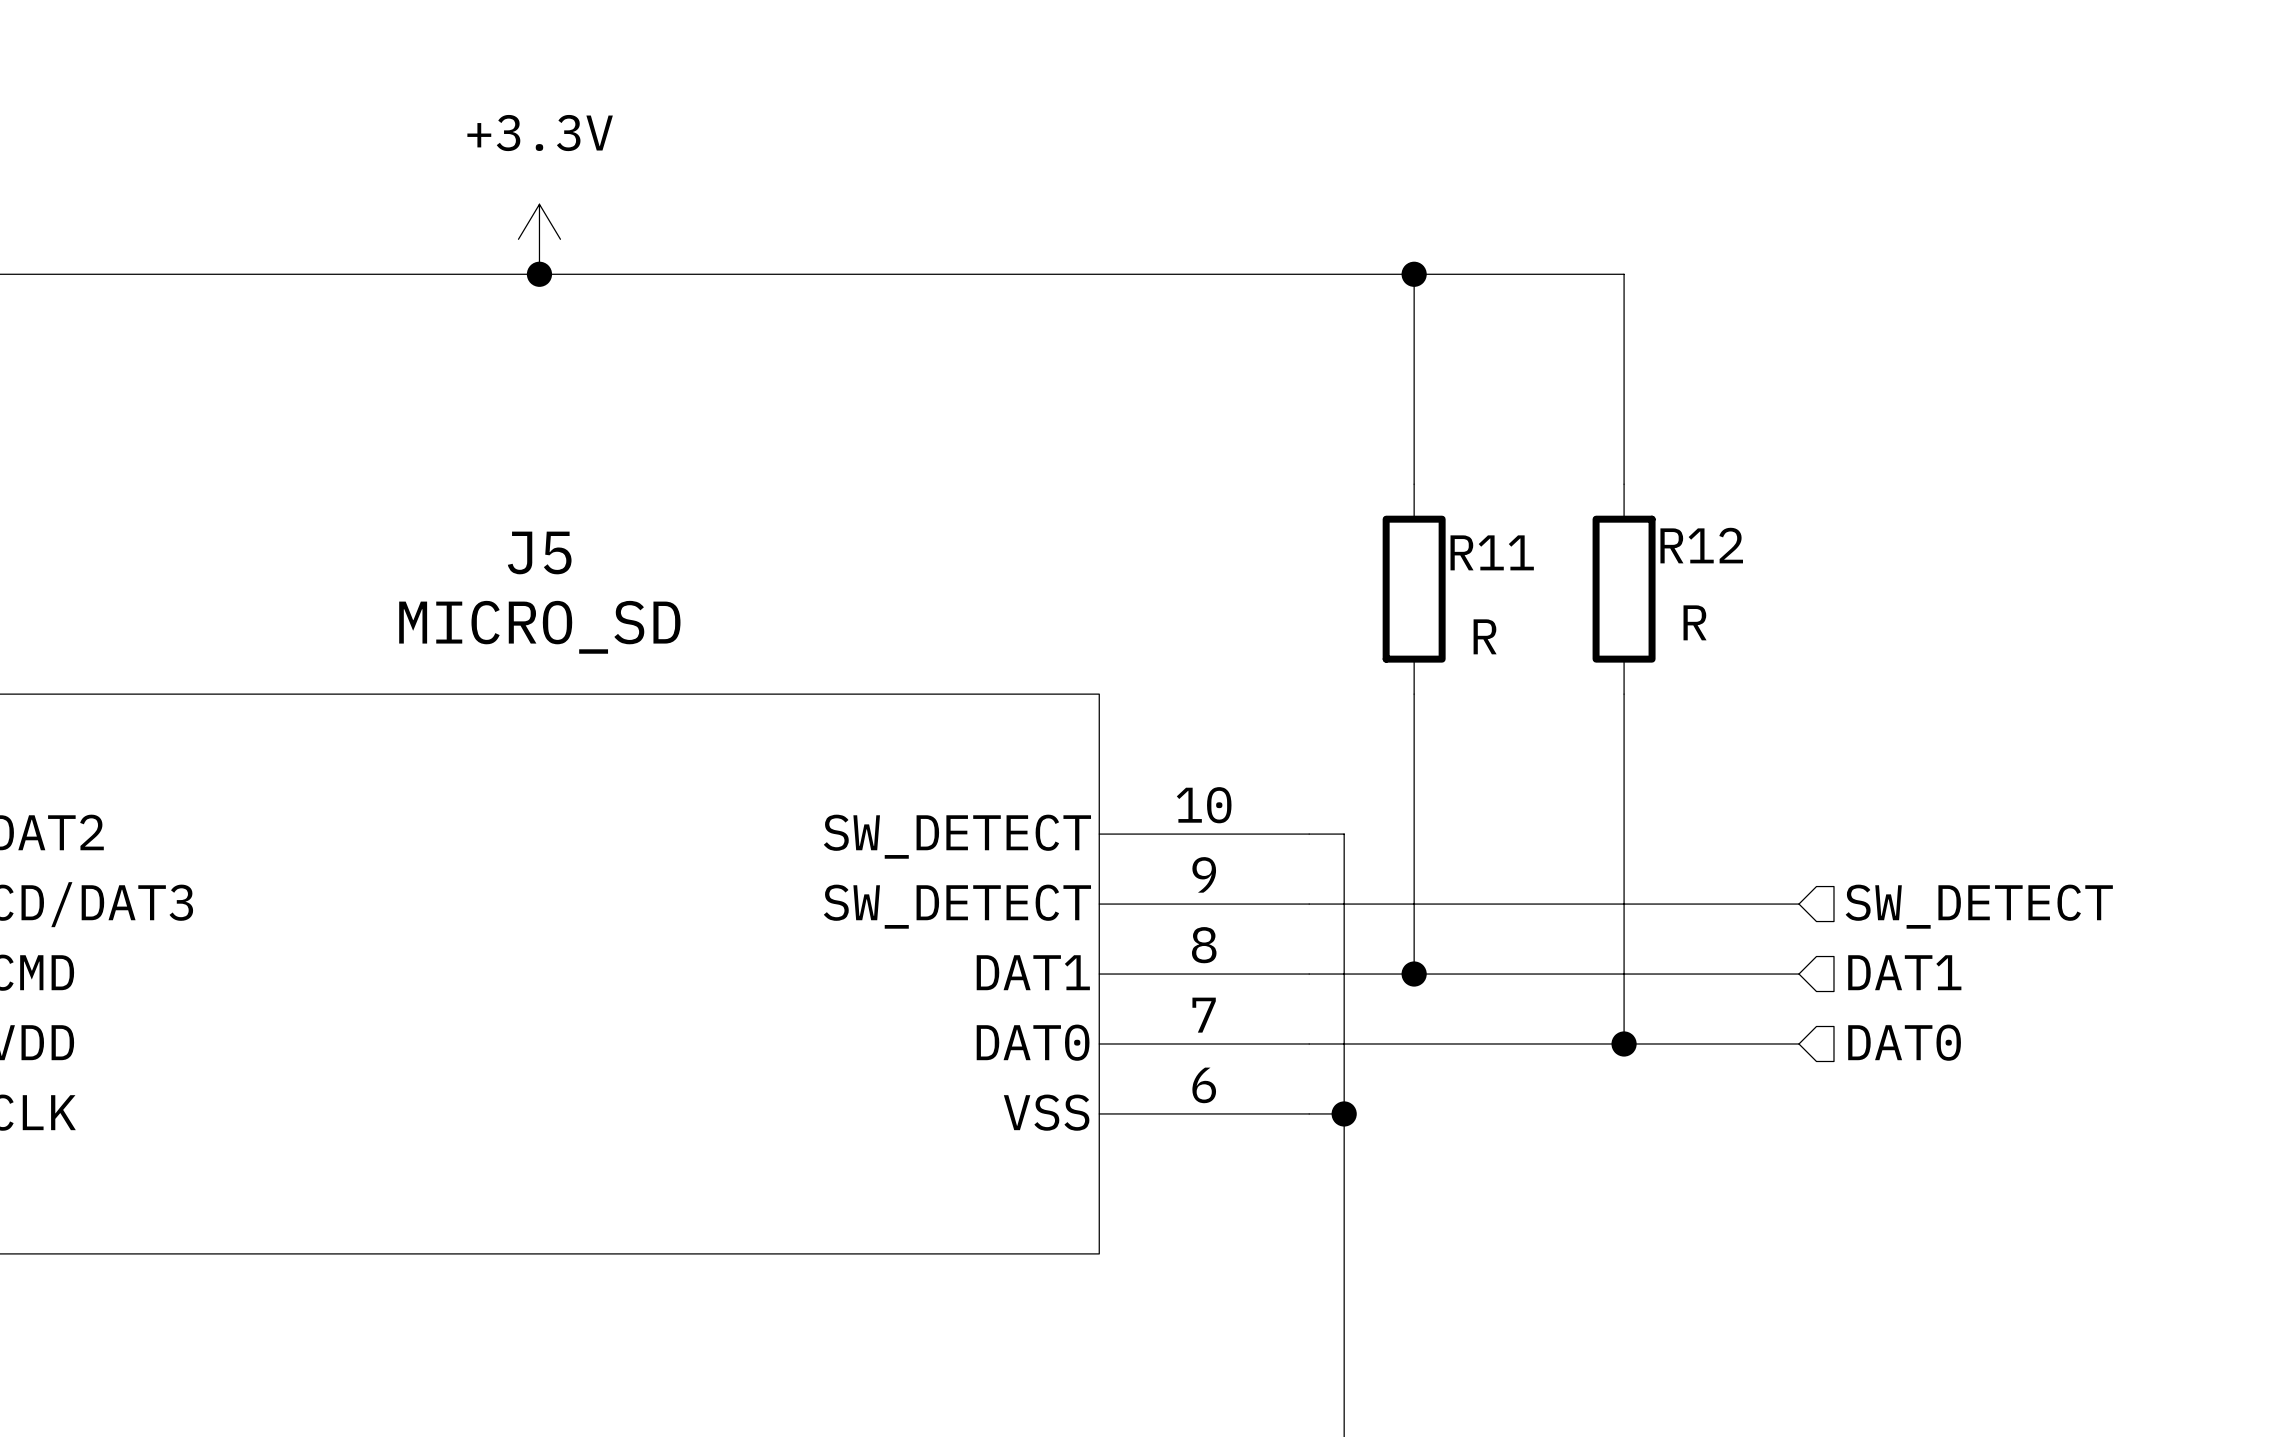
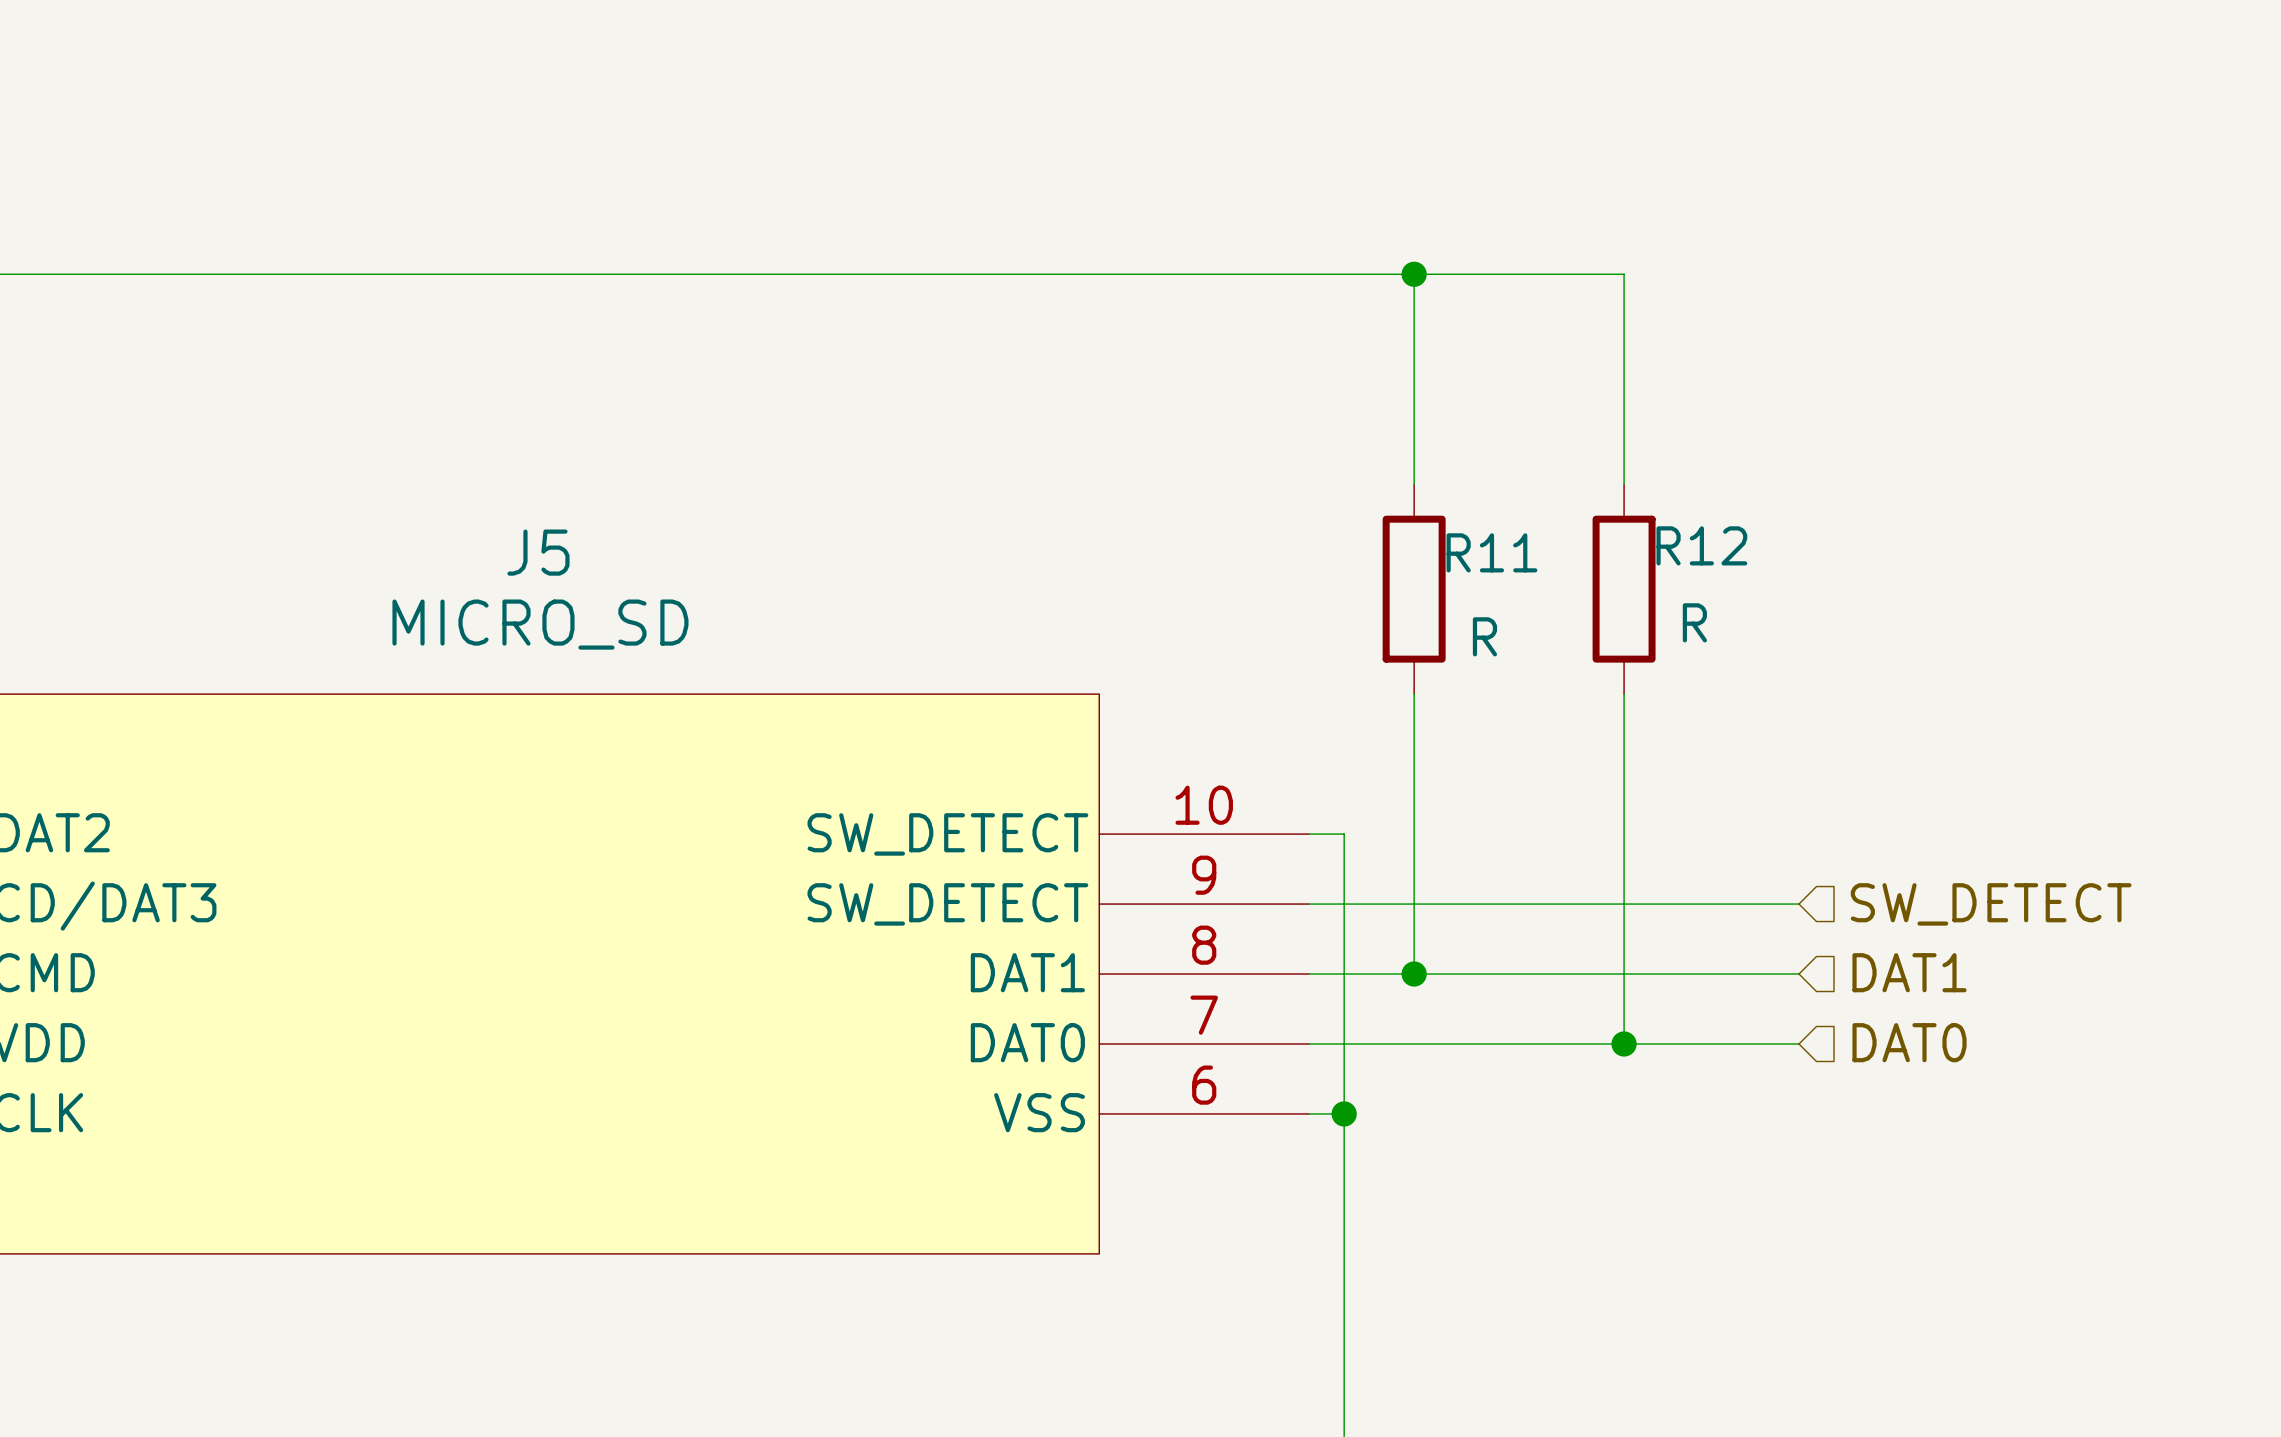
power symbol: +3.3V (539, 239) -> none
junction: (539, 274) -> none

